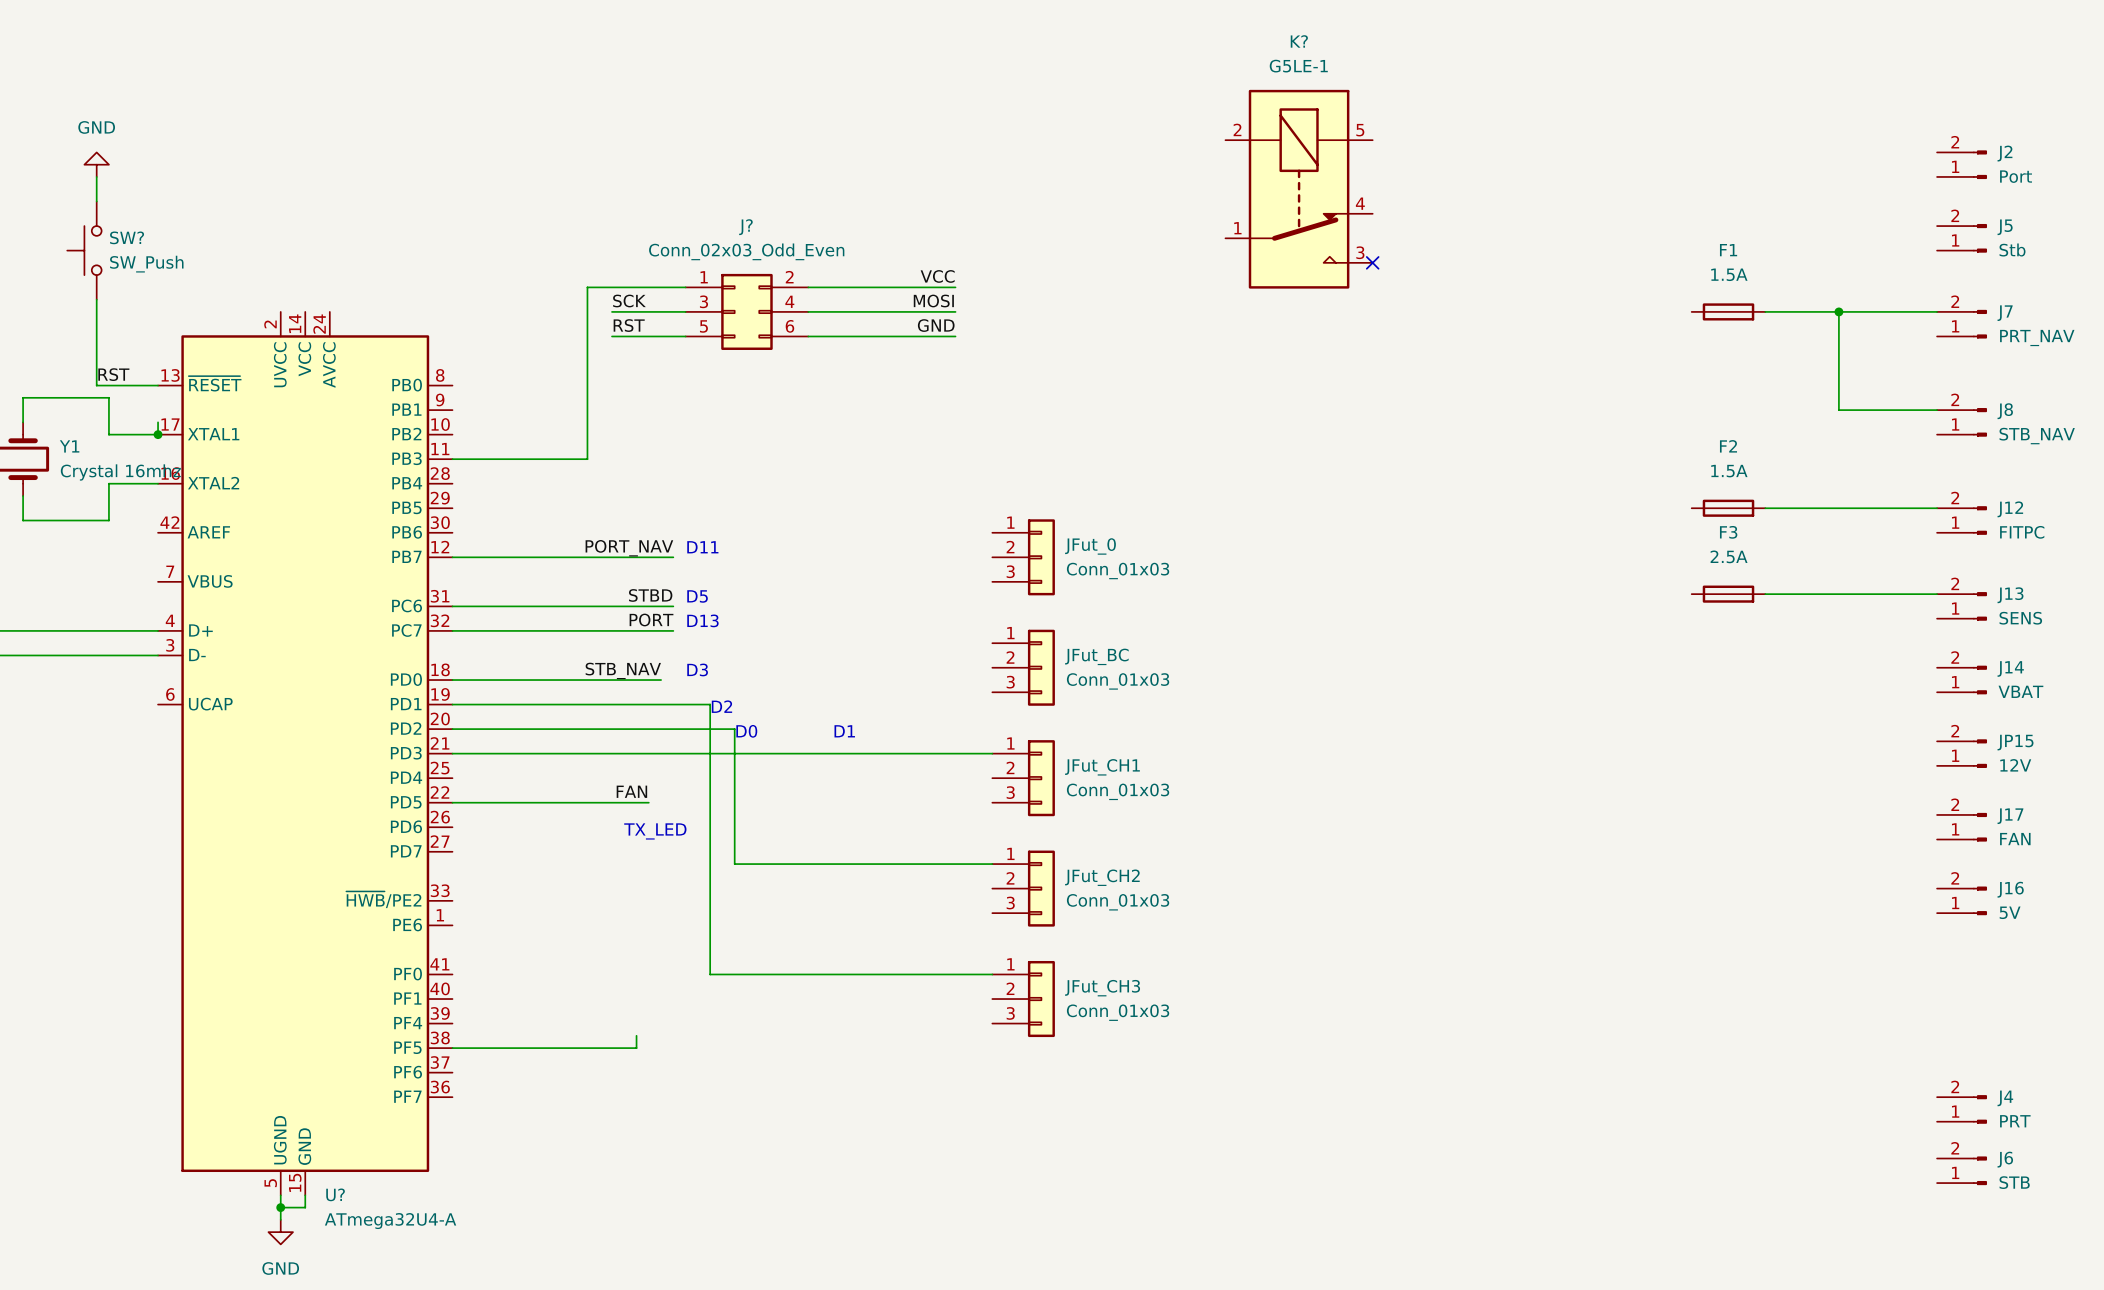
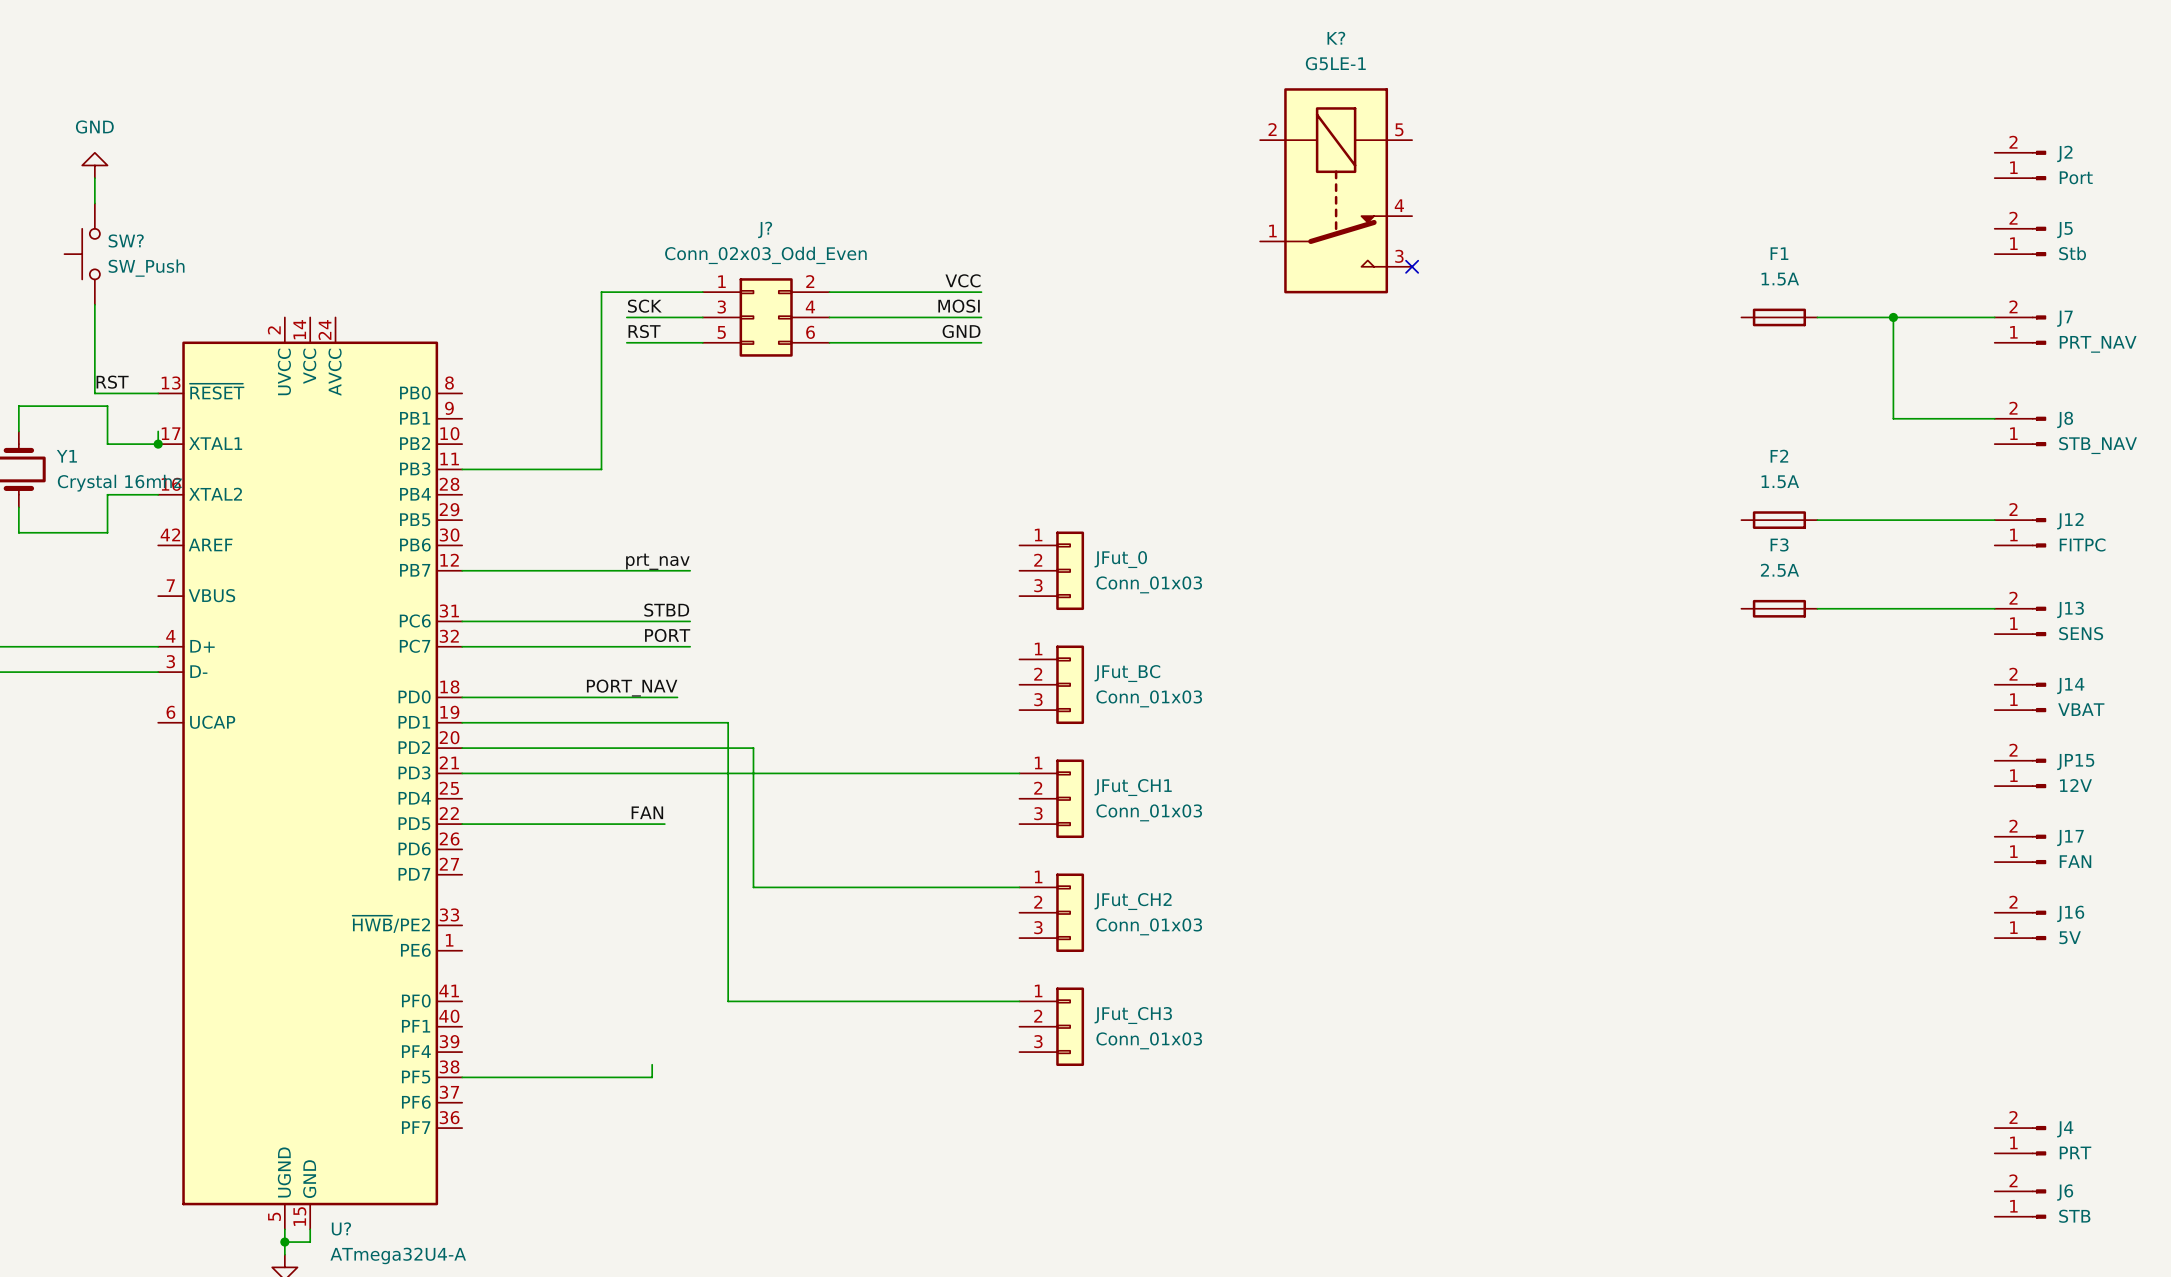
text: D11 (702, 547) -> none
label: PORT_NAV (629, 548) -> prt_nav (657, 561)
text: D5 (697, 596) -> none
text: D13 (702, 620) -> none
text: D3 (697, 669) -> none
label: STB_NAV (623, 670) -> PORT_NAV (632, 688)
text: D2 (721, 706) -> none
text: D0 (746, 731) -> none
text: D1 (844, 731) -> none
text: TX_LED (655, 831) -> none

